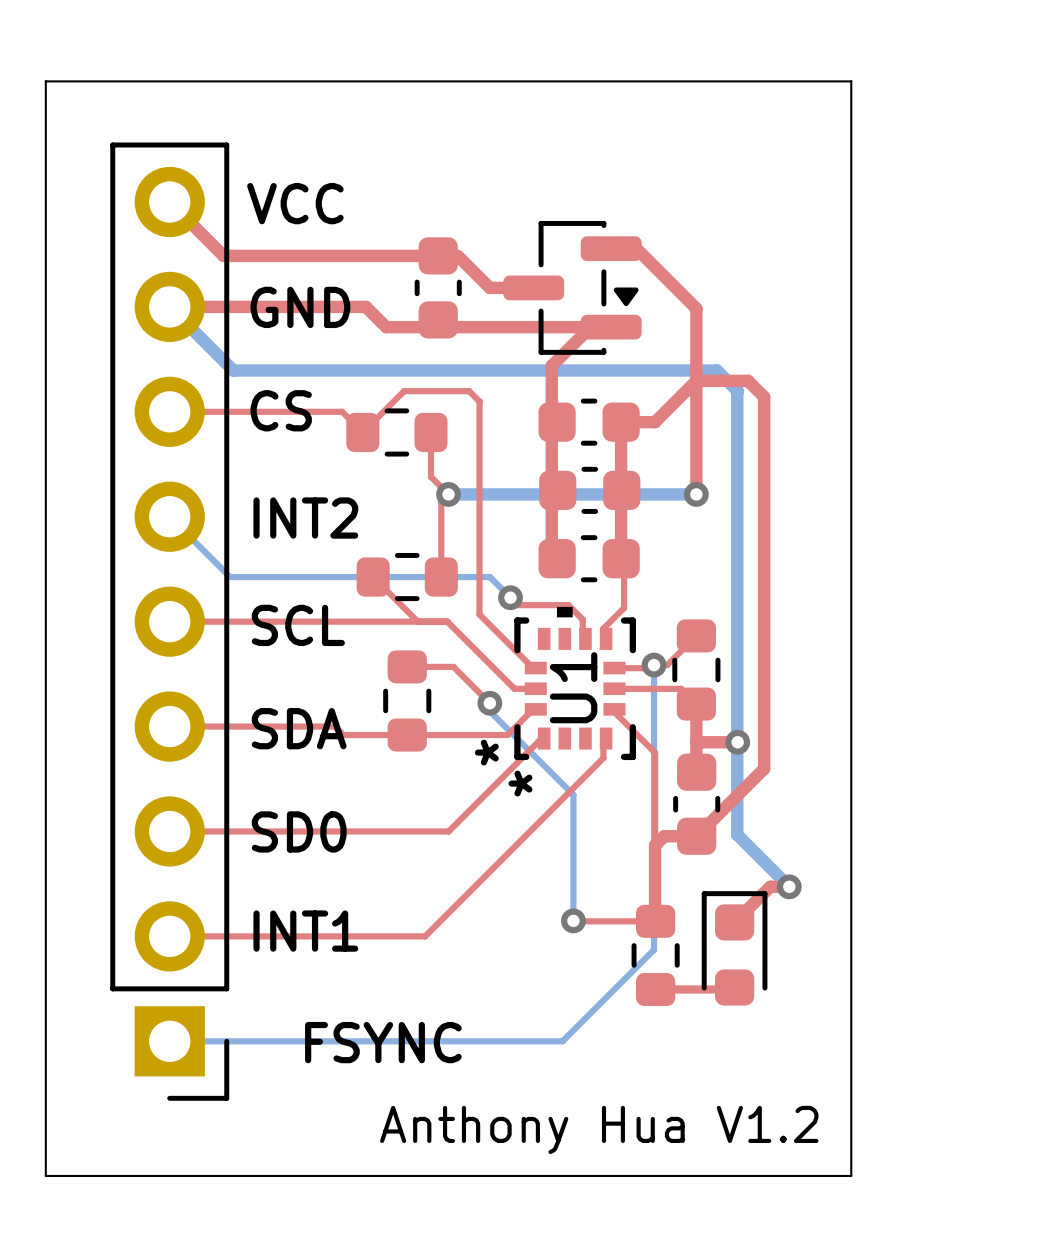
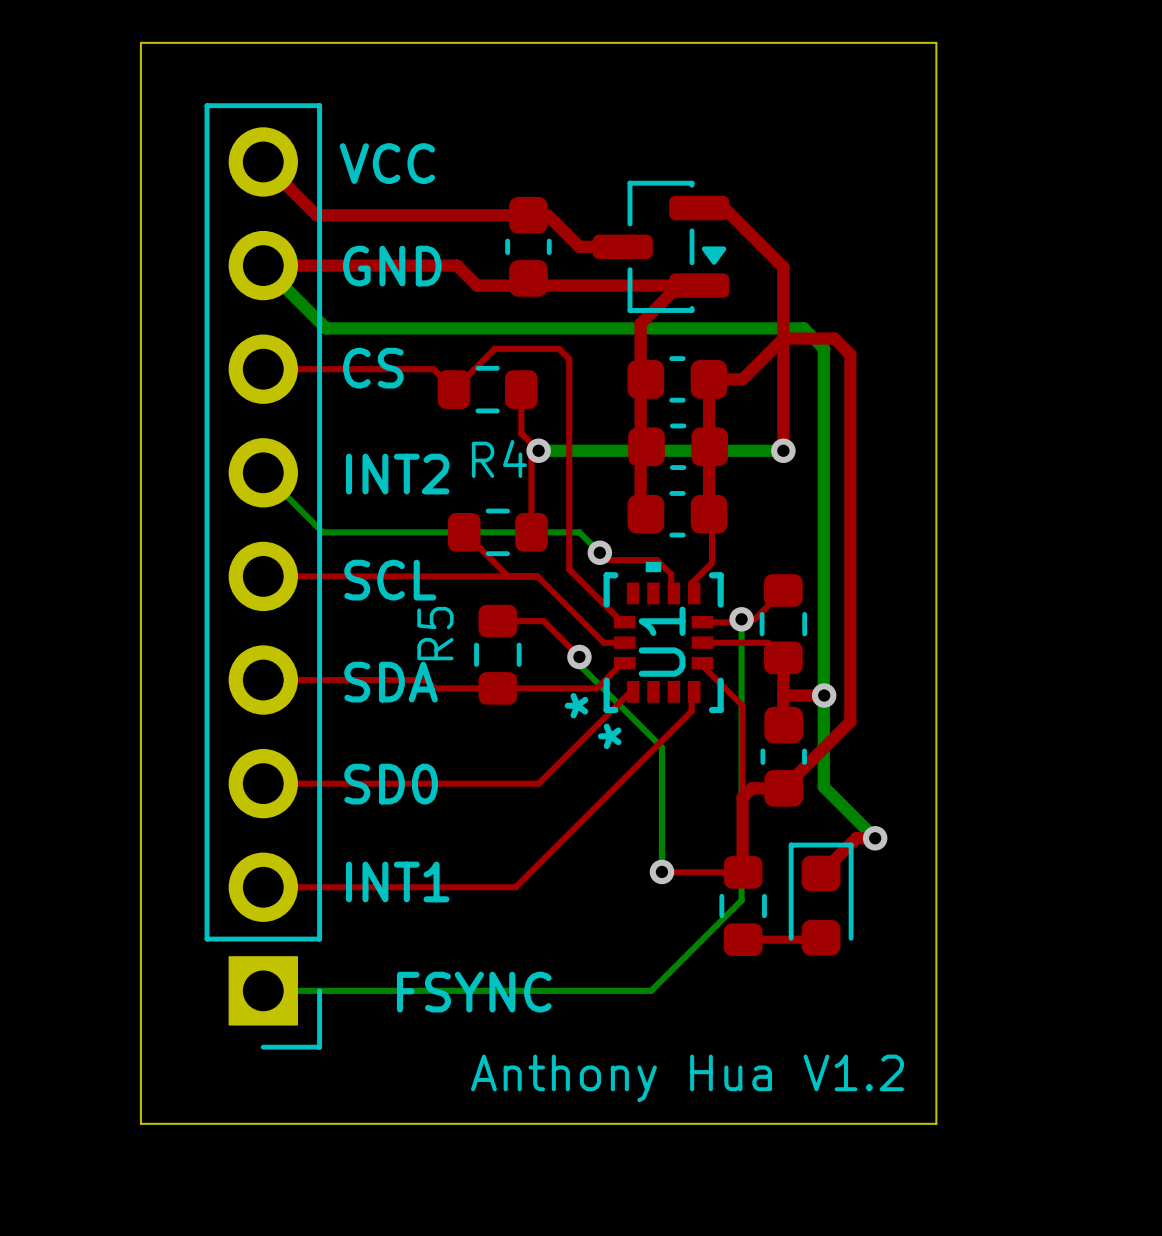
R4 name: none -> R4 (499, 458)
R5 name: none -> R5 (435, 633)

